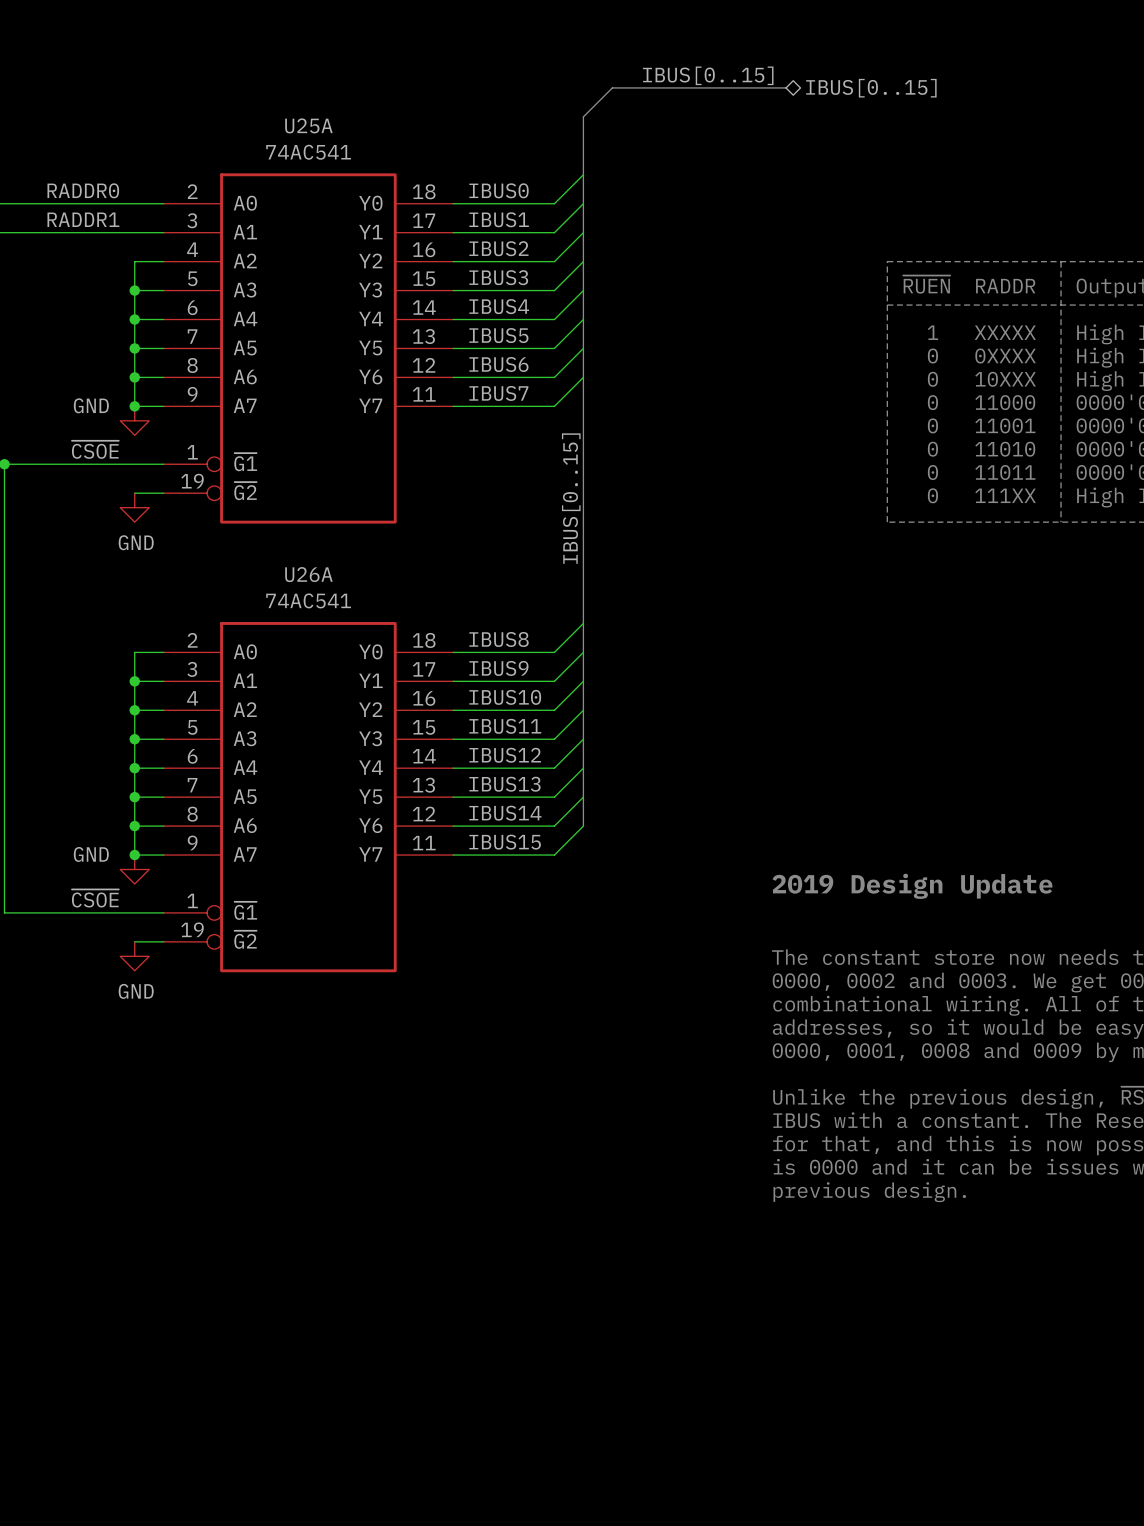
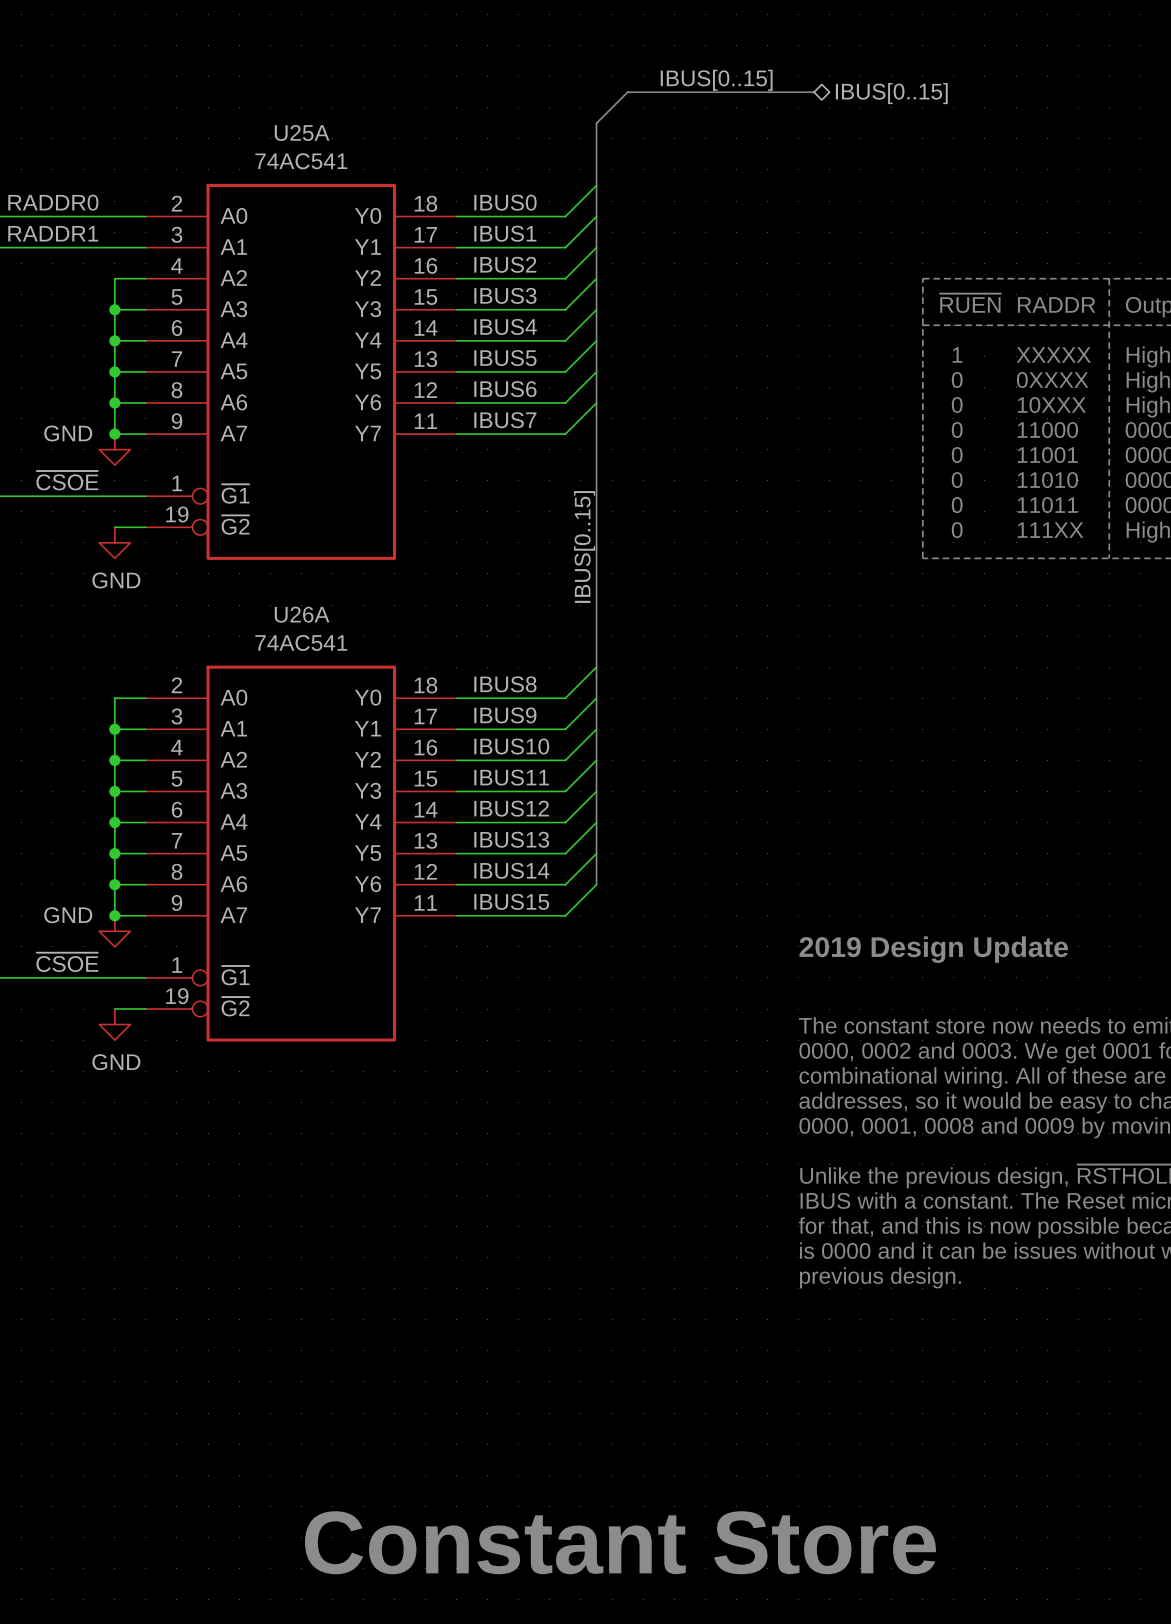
text: none -> Constant Store (620, 1542)

